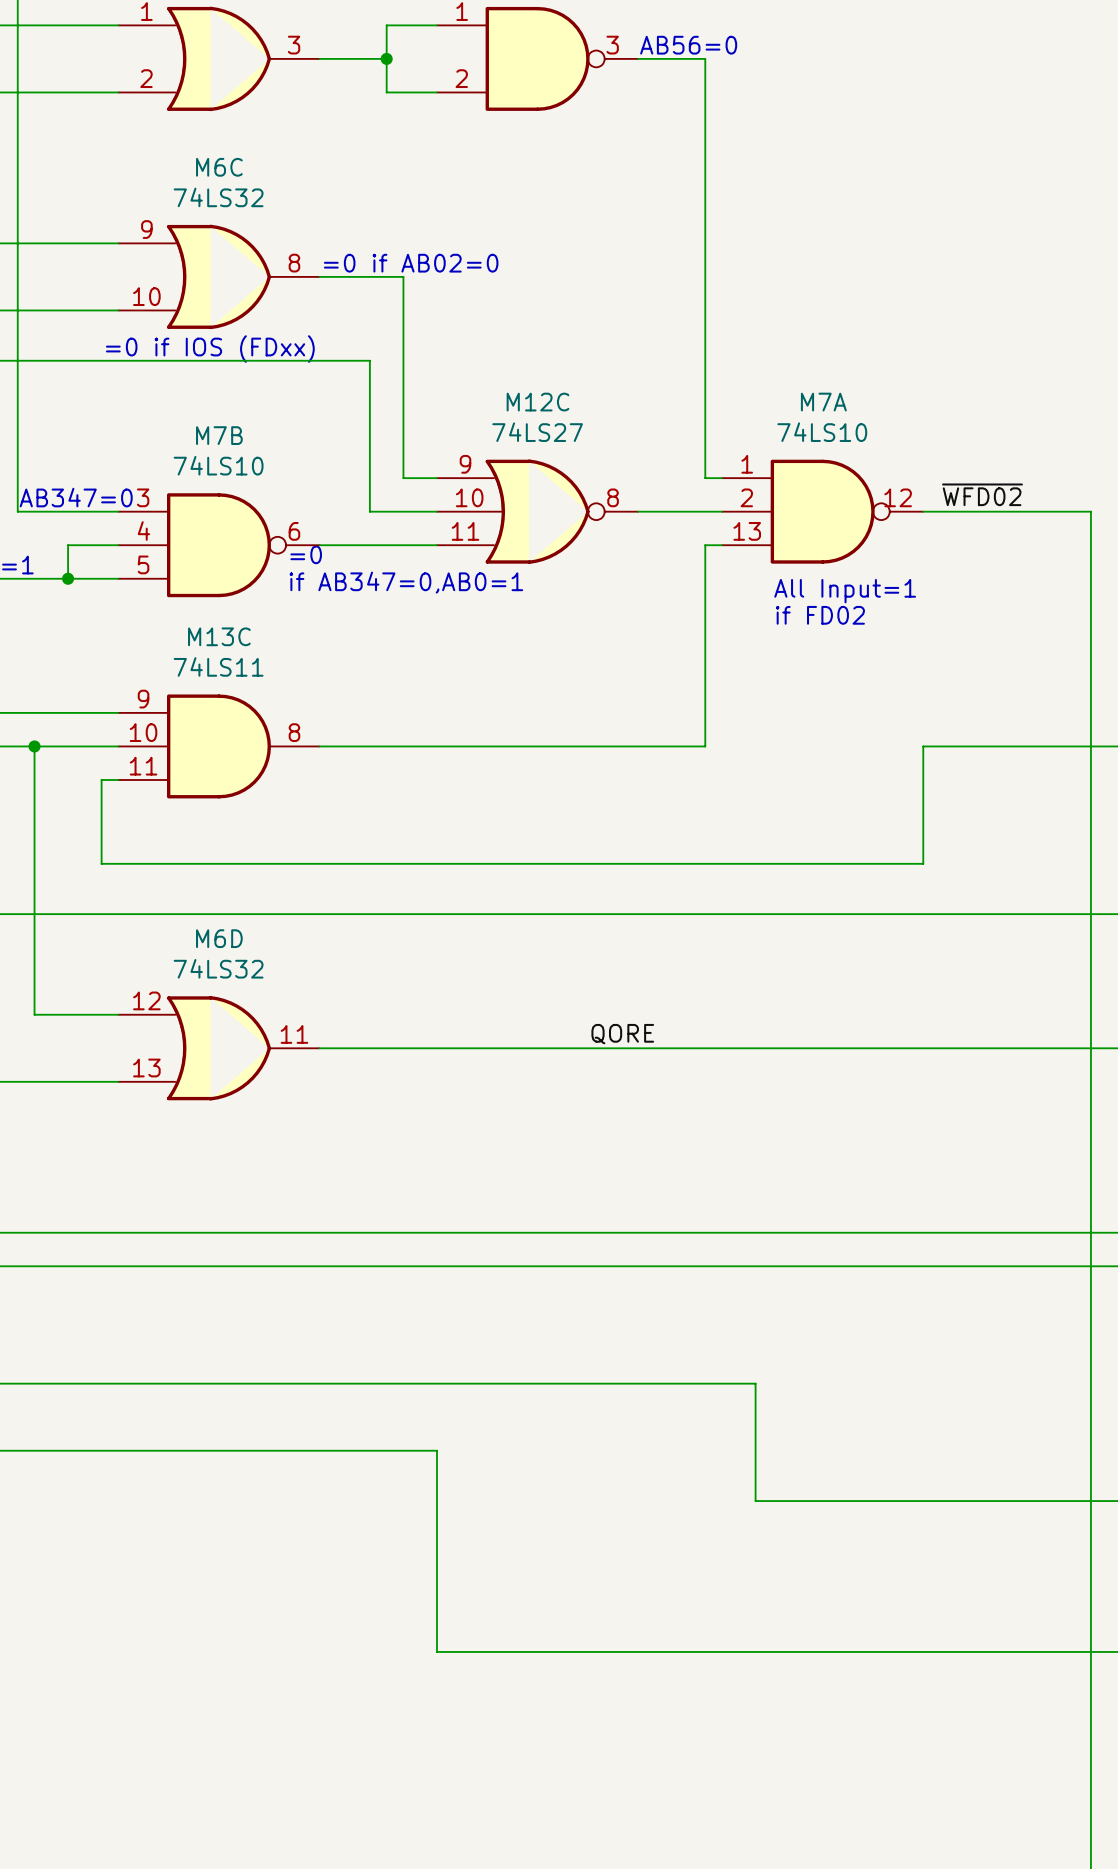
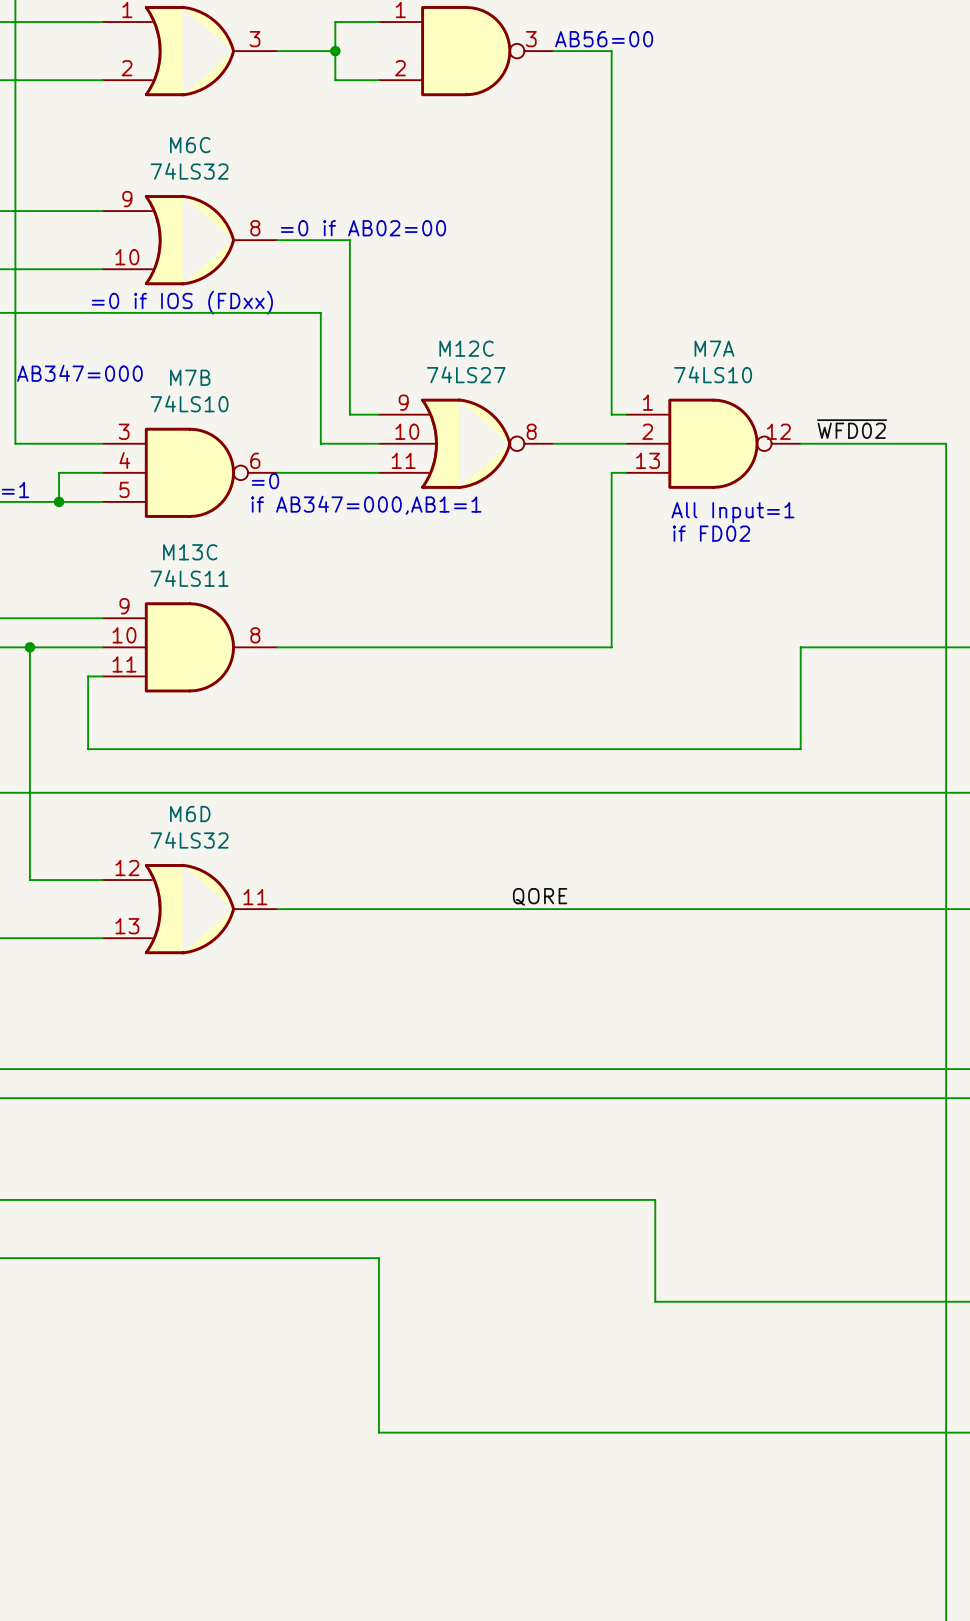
text: AB56=0 (688, 45) -> AB56=00 (604, 39)
text: =0 if AB02=0 (411, 263) -> =0 if AB02=00 (363, 228)
text: none -> AB347=000 (79, 373)
text: AB347=0 (76, 497) -> none
text: if AB347=0,AB0=1 (406, 582) -> if AB347=000,AB1=1 (366, 505)

